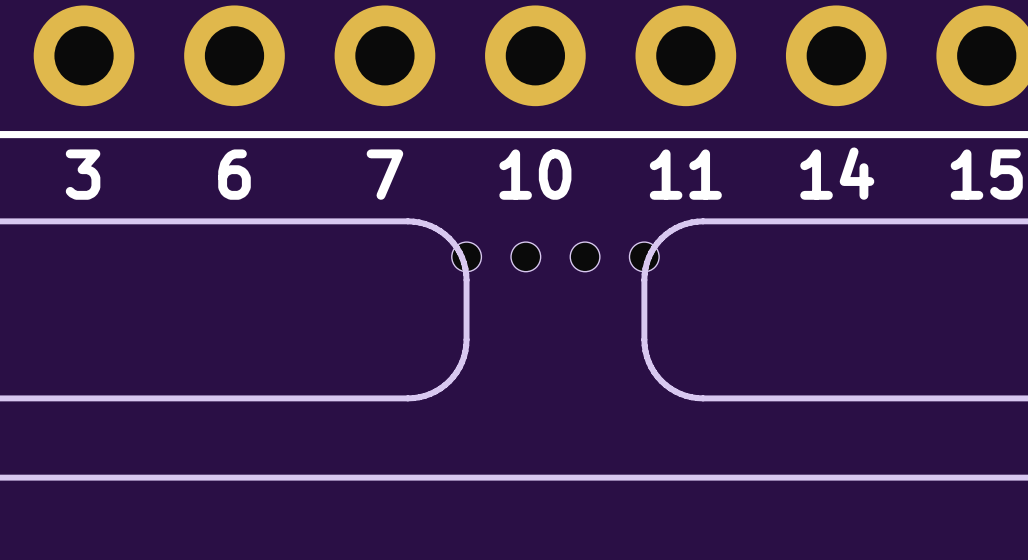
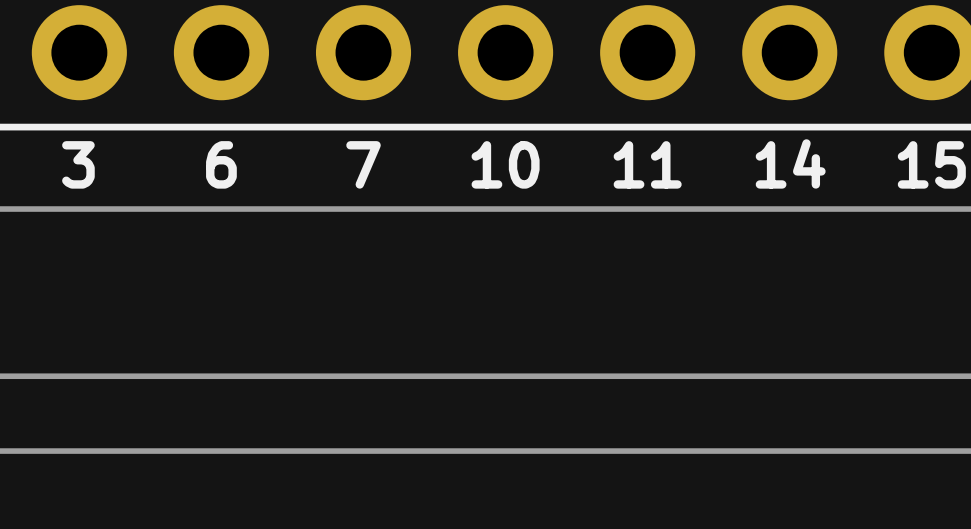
board edge: (407, 221) (430, 225) (449, 238) (462, 257) (466, 280) (466, 345) (459, 367) (449, 381) (440, 388) (424, 395) (407, 398) -> (385, 209) (663, 209)
board edge: (703, 221) (680, 225) (661, 238) (648, 257) (644, 280) (644, 345) (651, 367) (661, 381) (670, 388) (685, 395) (703, 398) -> (385, 376) (663, 376)
part: (466, 256) -> none
part: (525, 256) -> none
part: (585, 256) -> none
part: (644, 256) -> none

